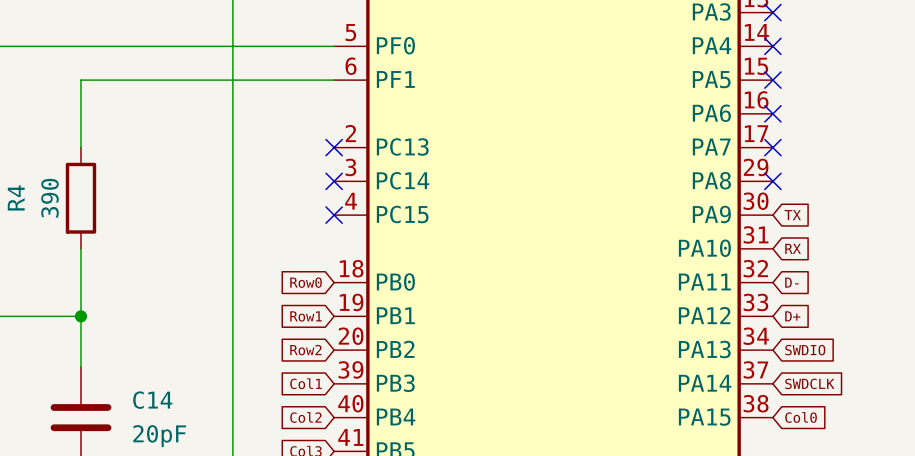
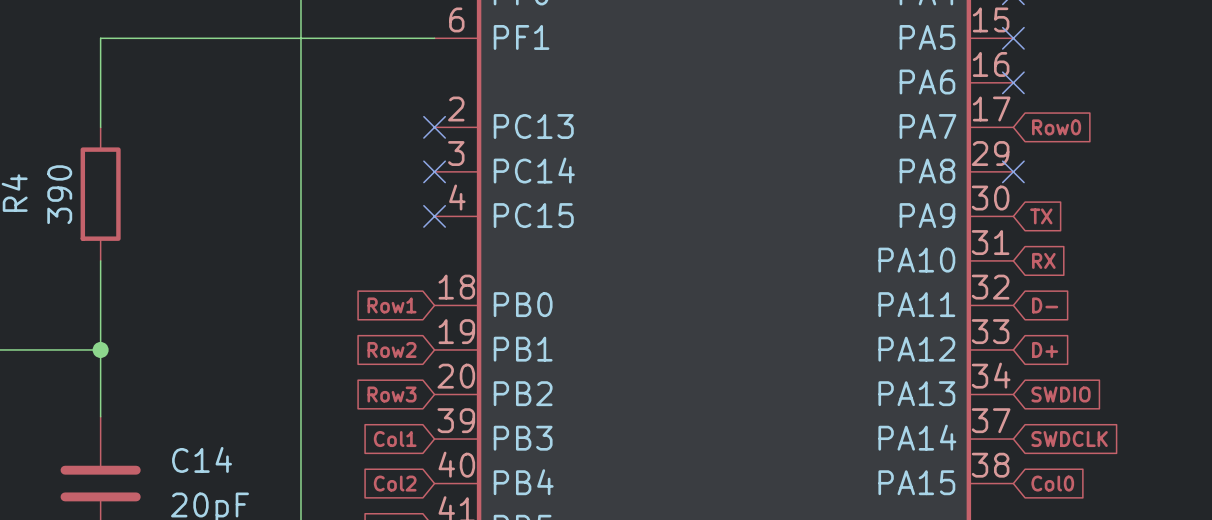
no-connect mark: (772, 147) -> none
global label: none -> Row0 (1056, 127)
global label: Row0 (306, 282) -> Row1 (392, 305)
global label: Row1 (306, 316) -> Row2 (392, 349)
global label: Row2 (305, 350) -> Row3 (392, 394)

